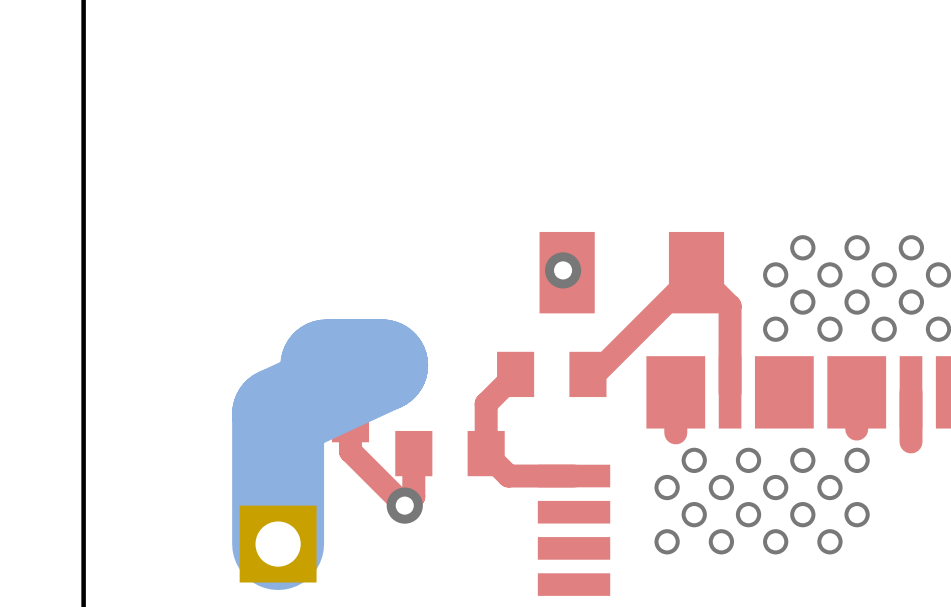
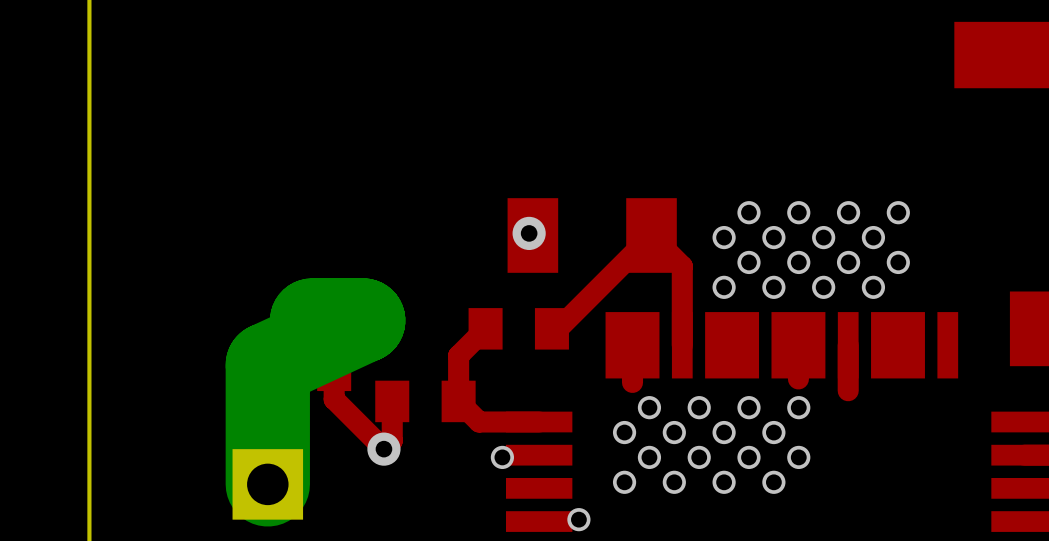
via: none -> (502, 457)
via: none -> (578, 519)

